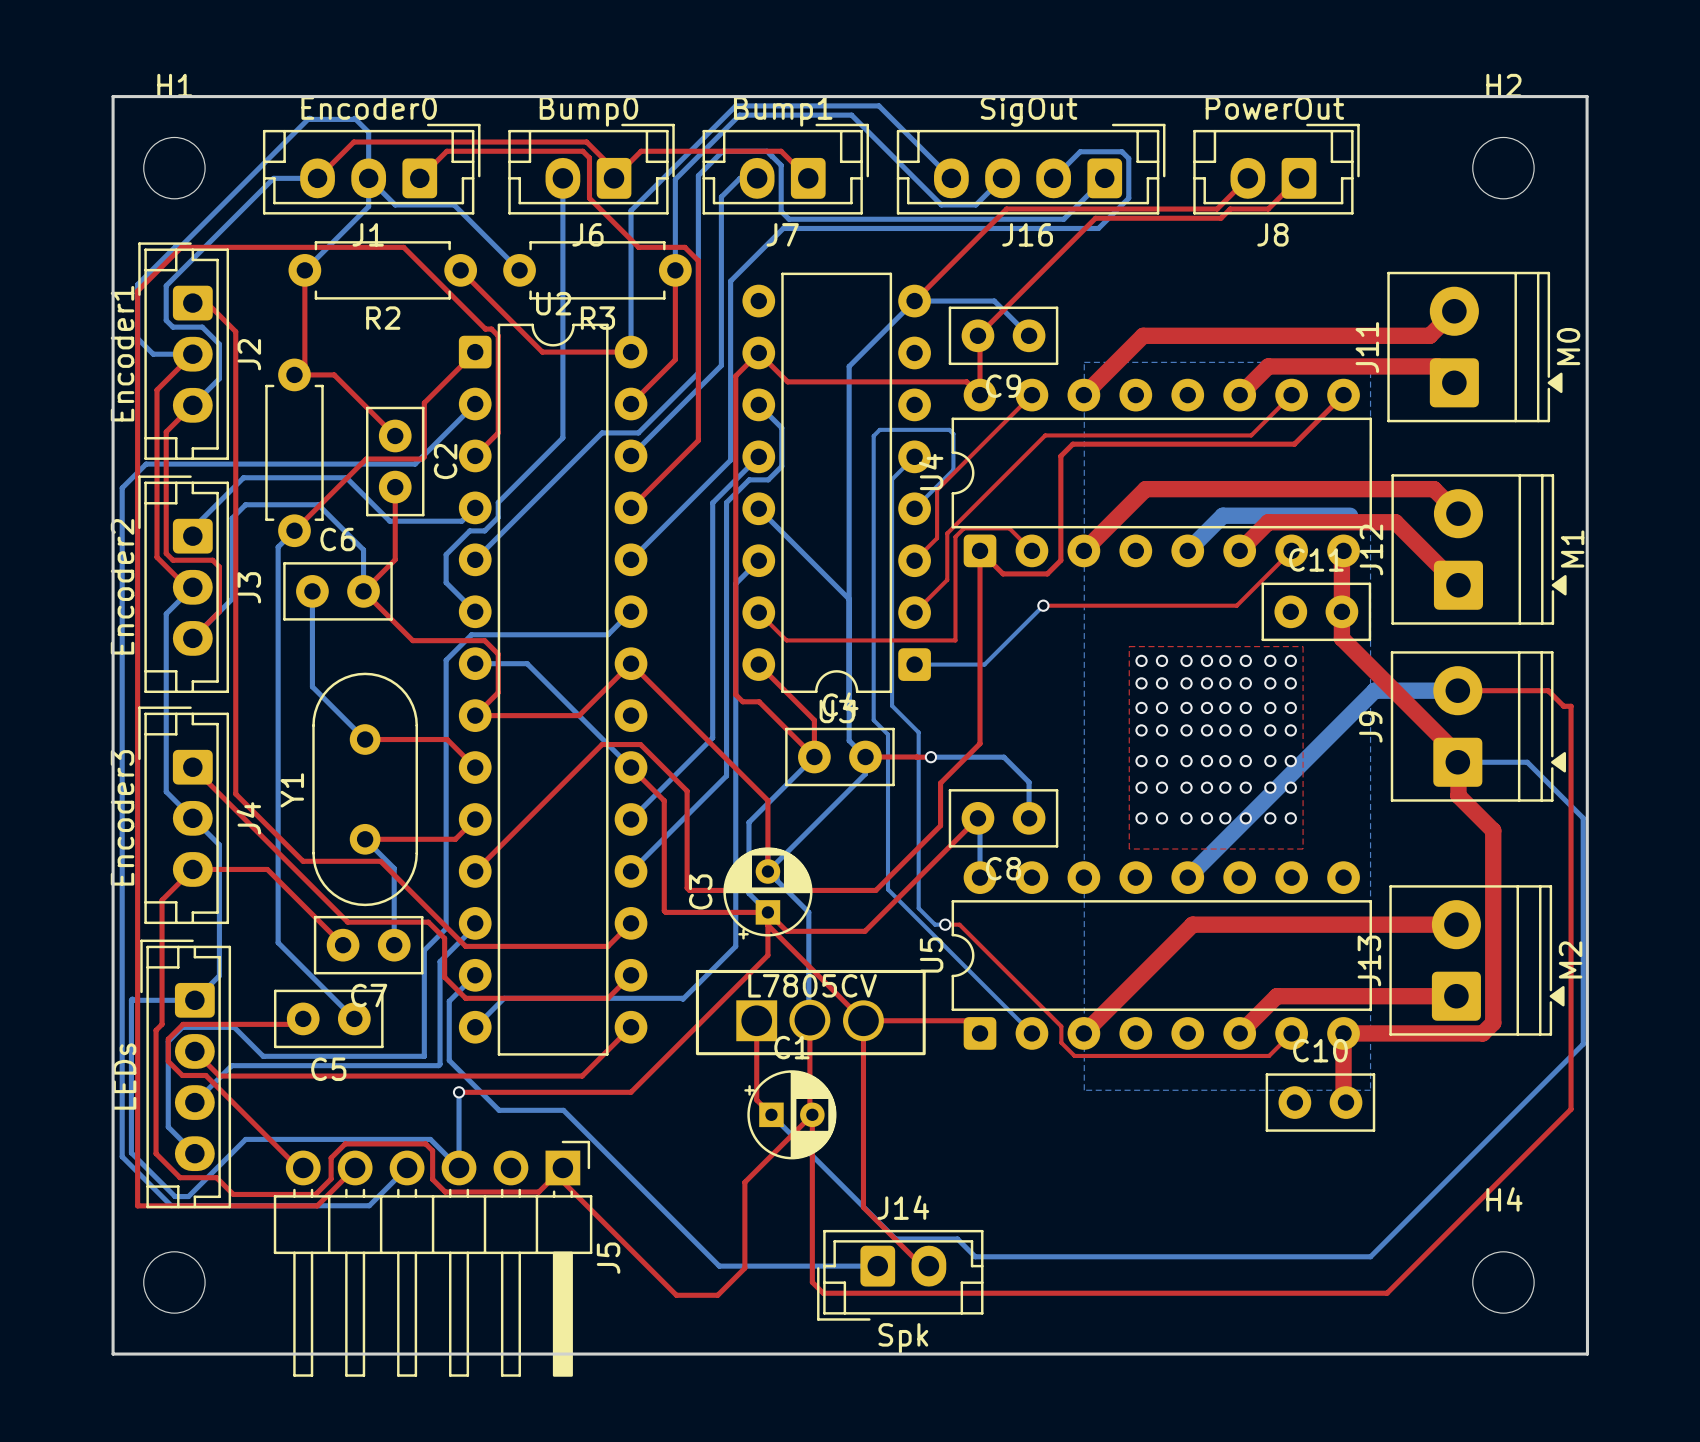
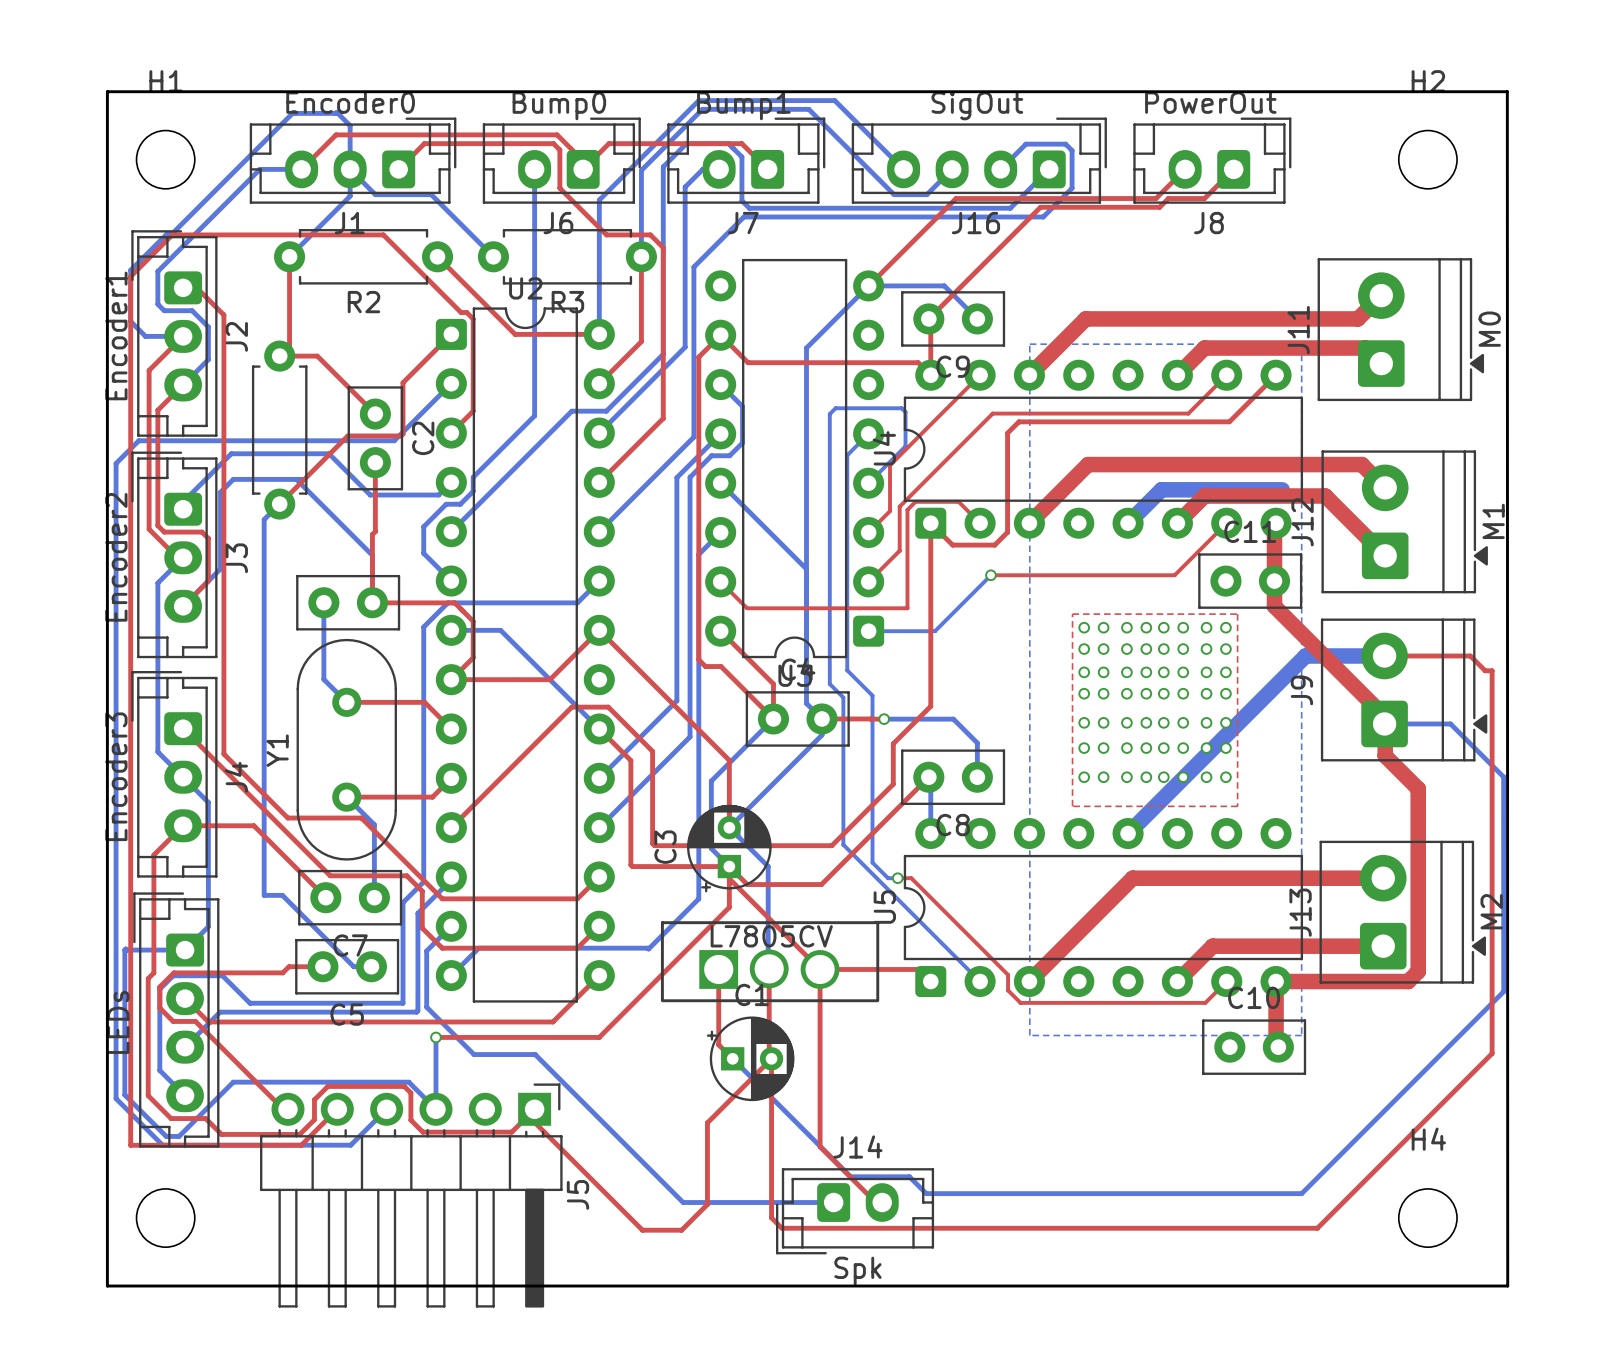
bottom track: none -> (296, 479) (372, 555) (372, 602)
bottom track: (318, 504) (363, 549) (363, 591) -> none
top track: (392, 562) (363, 591) (412, 640) (484, 640) -> (372, 602) (454, 602) (460, 608)
top track: none -> (372, 534) (372, 602)
bottom track: (312, 591) (312, 686) (341, 715) -> (323, 602) (323, 679)
C6: (337, 591) -> none
part: none -> (348, 602)
bottom track: (278, 942) (354, 1018) -> (264, 895) (282, 895) (353, 966) (371, 966)
top track: none -> (322, 966) (287, 967)
C5 position: (328, 1018) -> (347, 966)

